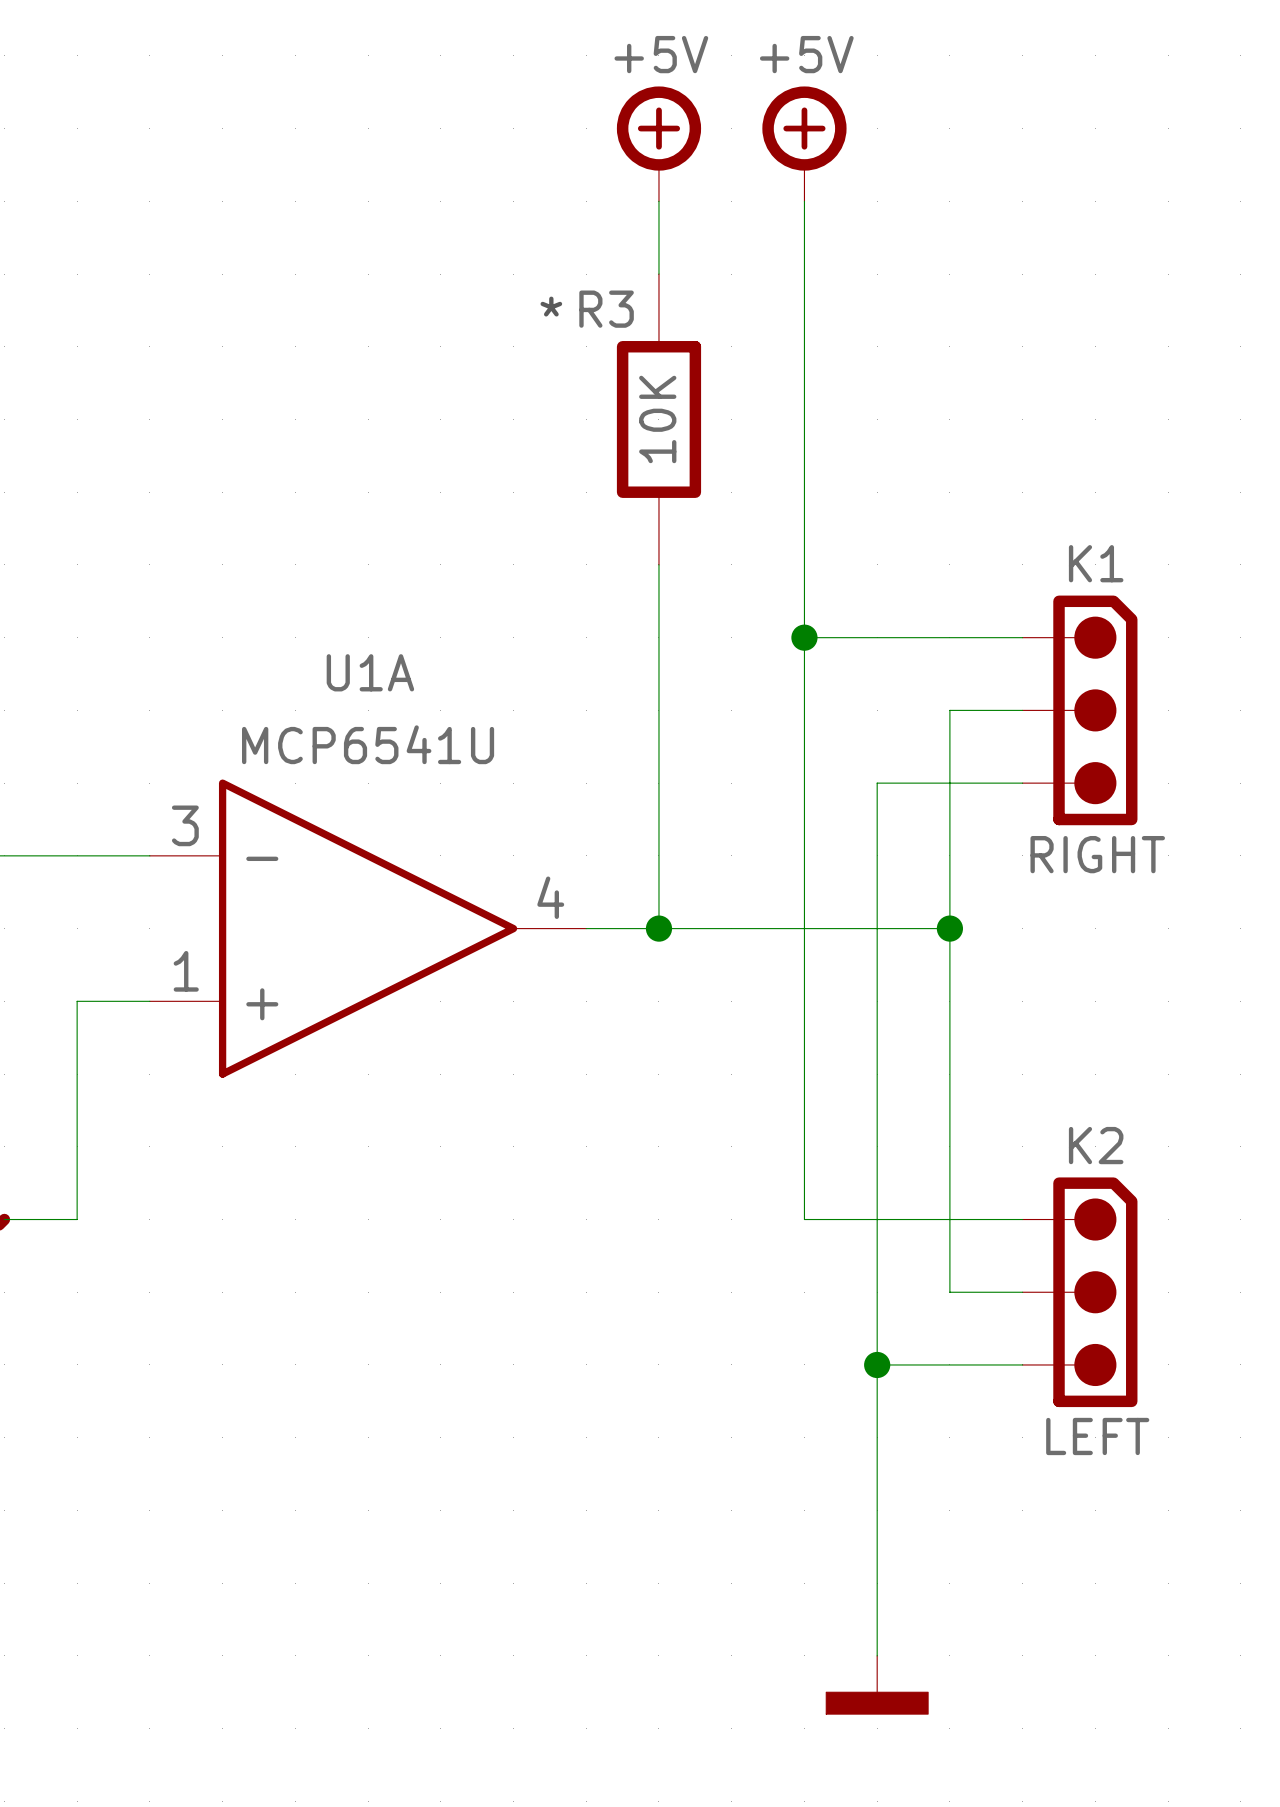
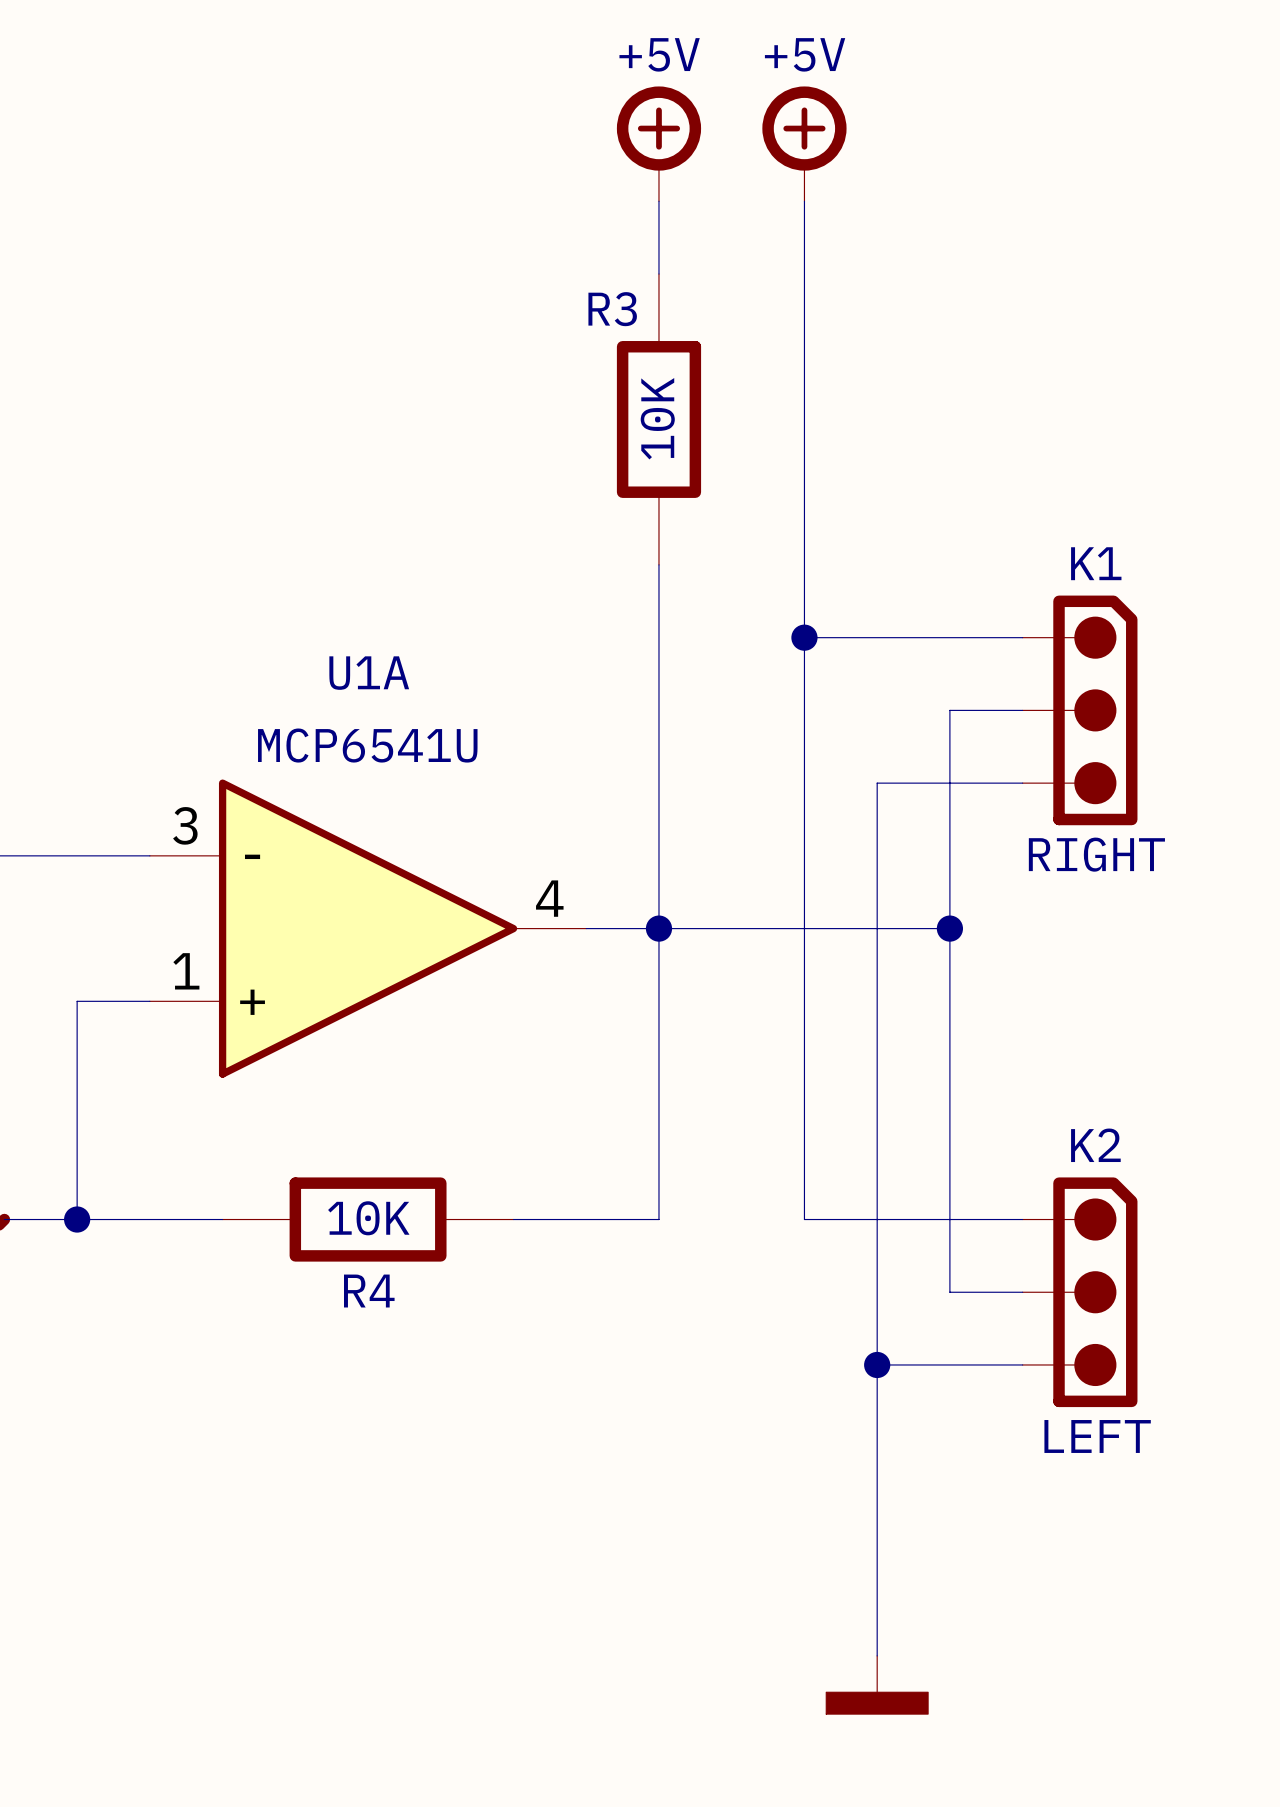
text: * (551, 306) -> none
wire: none -> (658, 928) (658, 1219) (513, 1219)
wire: none -> (77, 1219) (222, 1219)
junction: none -> (77, 1219)
R4: none -> 10K (368, 1219)

